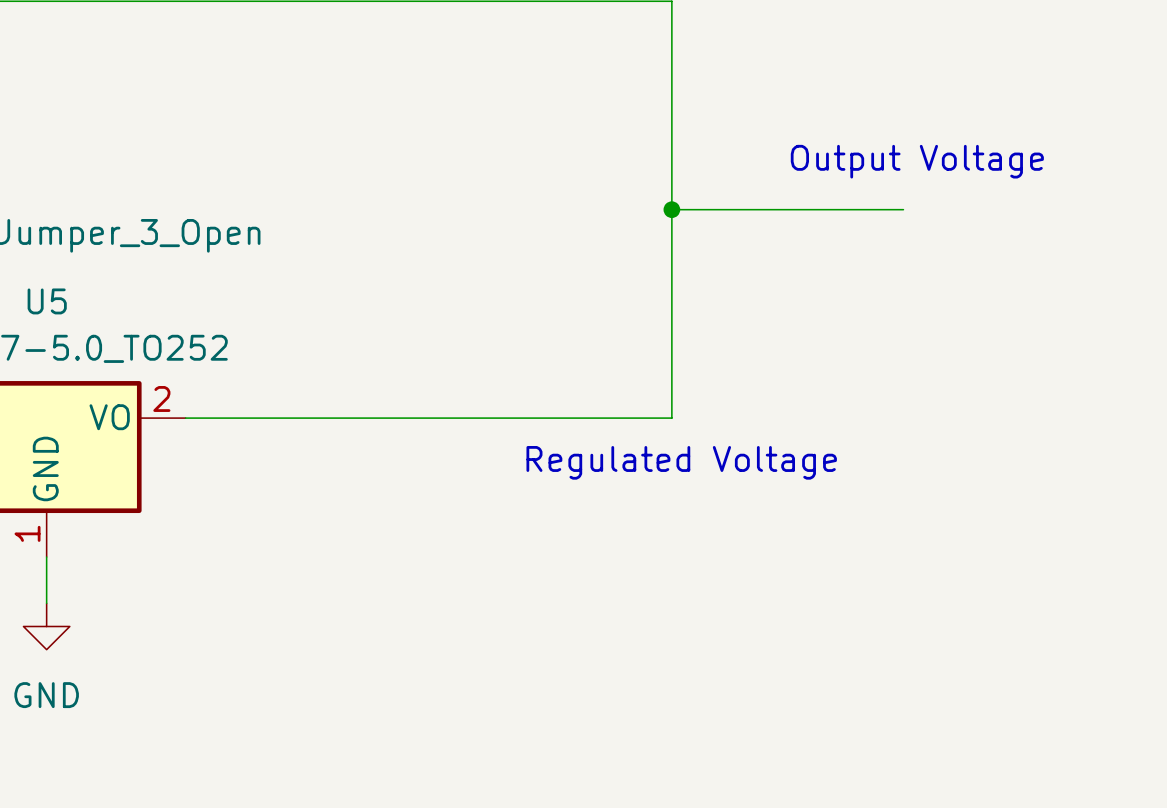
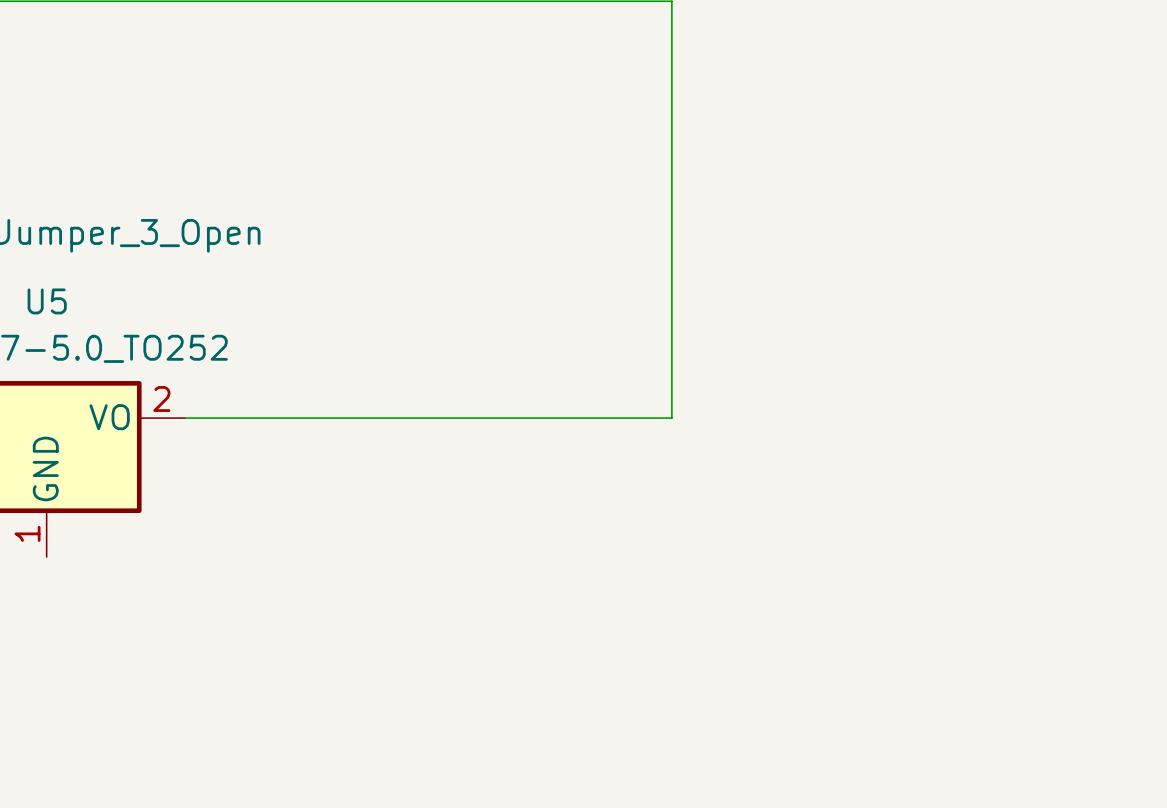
text: Output Voltage (917, 161) -> none
wire: (671, 209) (903, 209) -> none
junction: (671, 209) -> none
text: Regulated Voltage (681, 462) -> none
wire: (46, 557) (46, 603) -> none
power symbol: GND (46, 626) -> none

